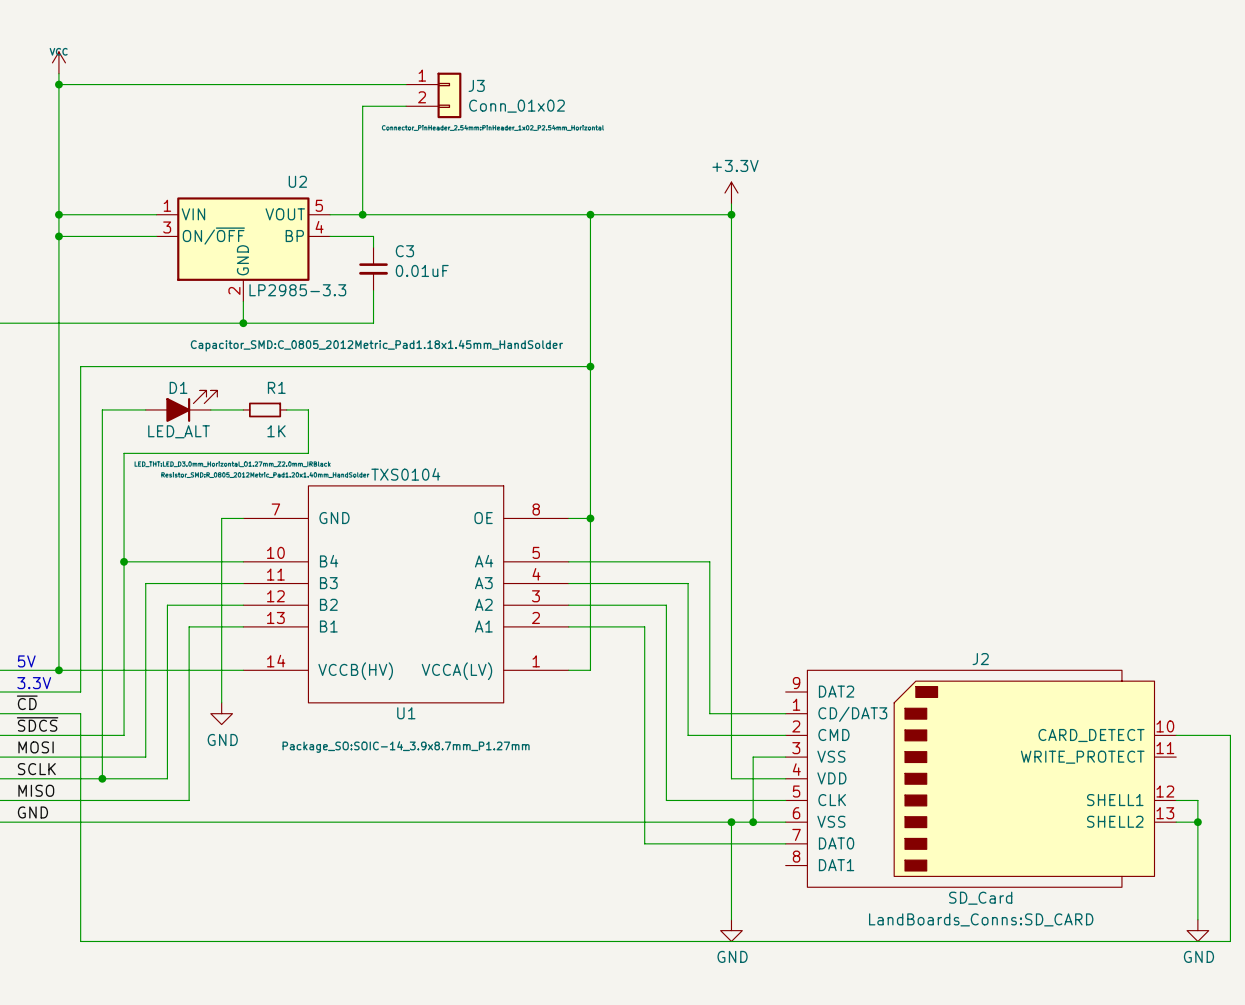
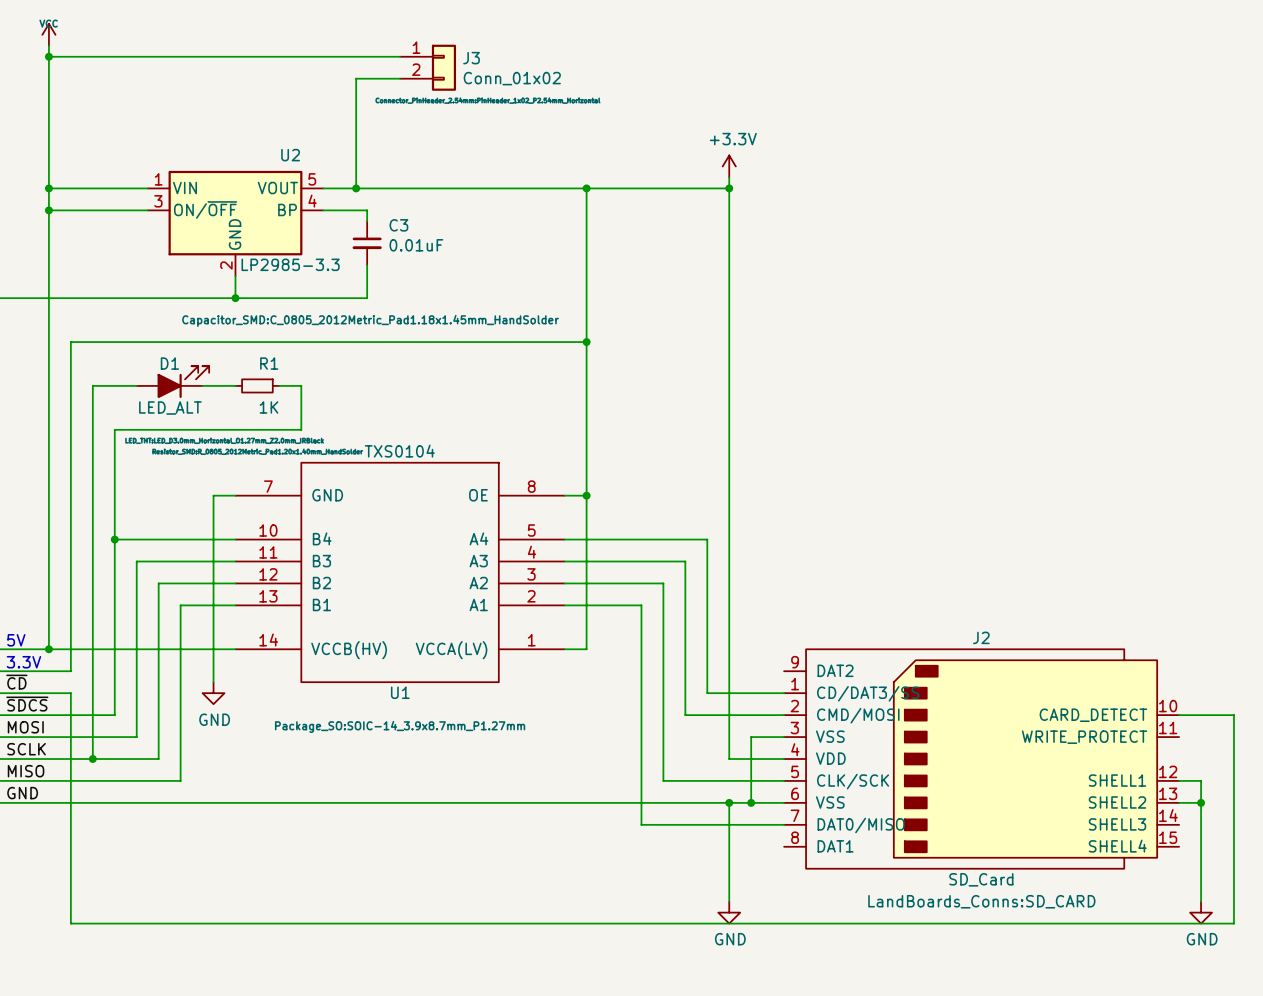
J2 symbol: [785, 670, 1177, 888] -> [784, 649, 1180, 869]

